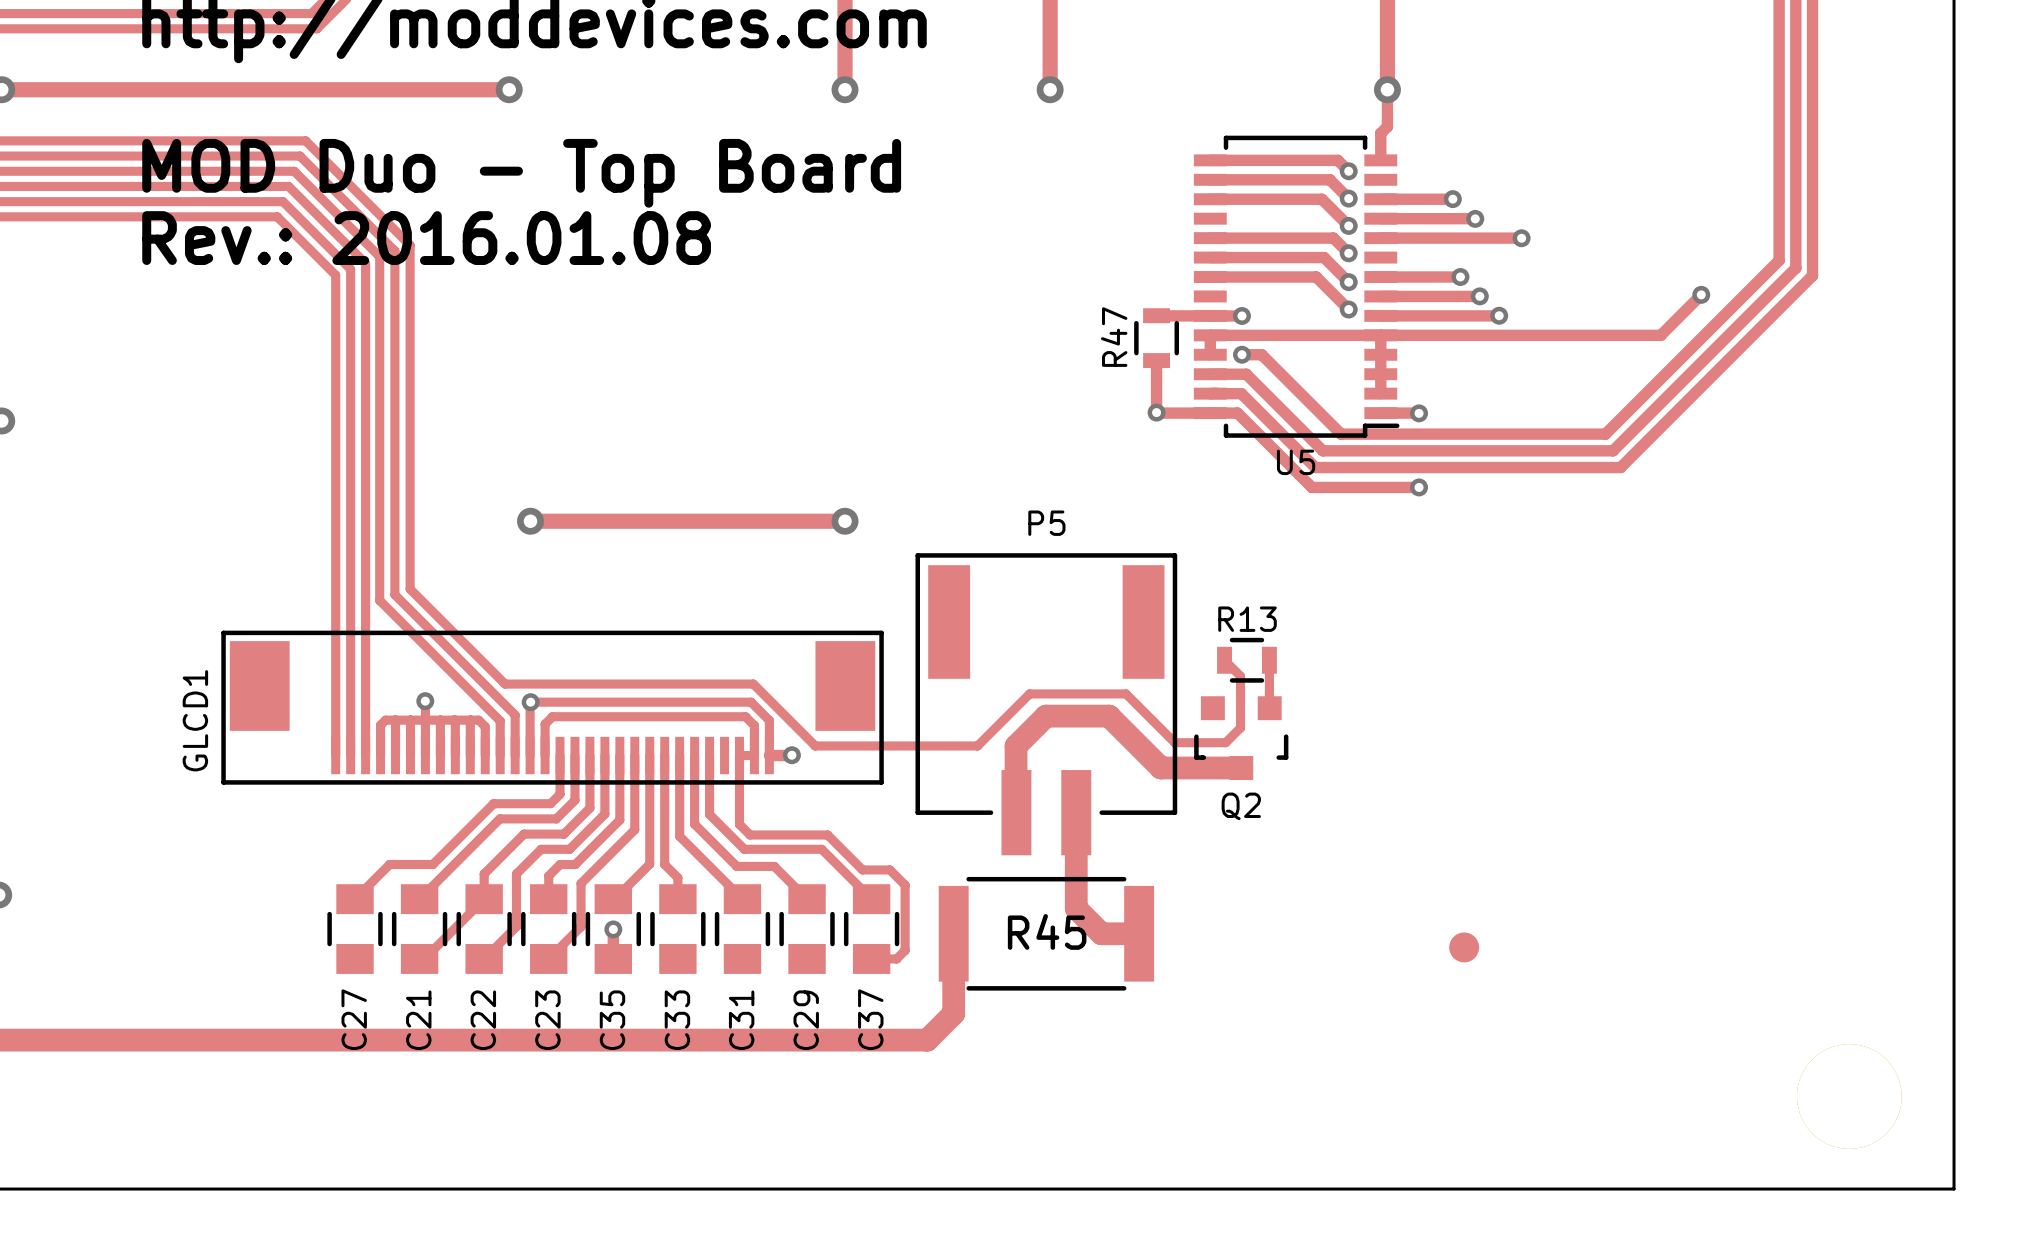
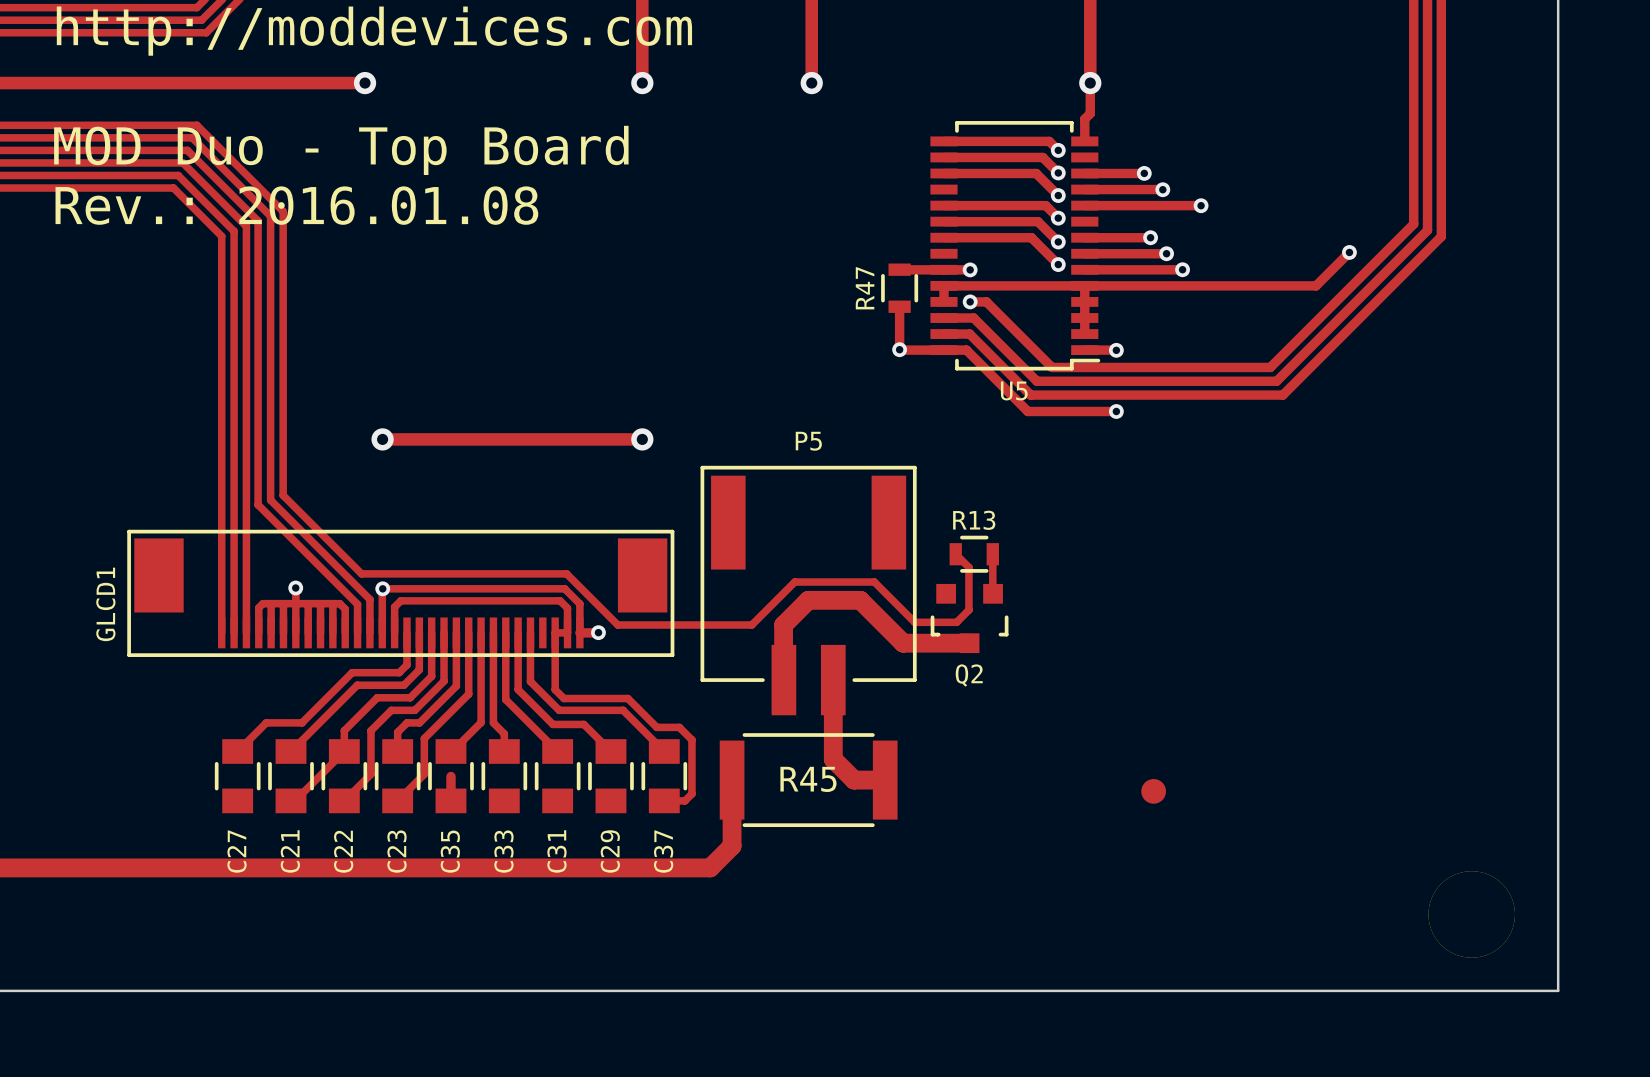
via: (613, 929) -> none

